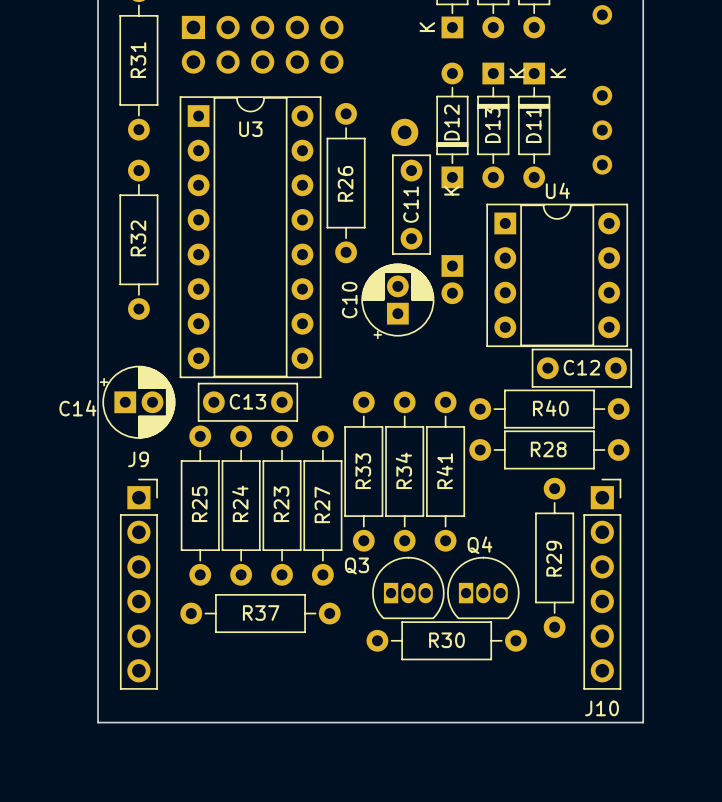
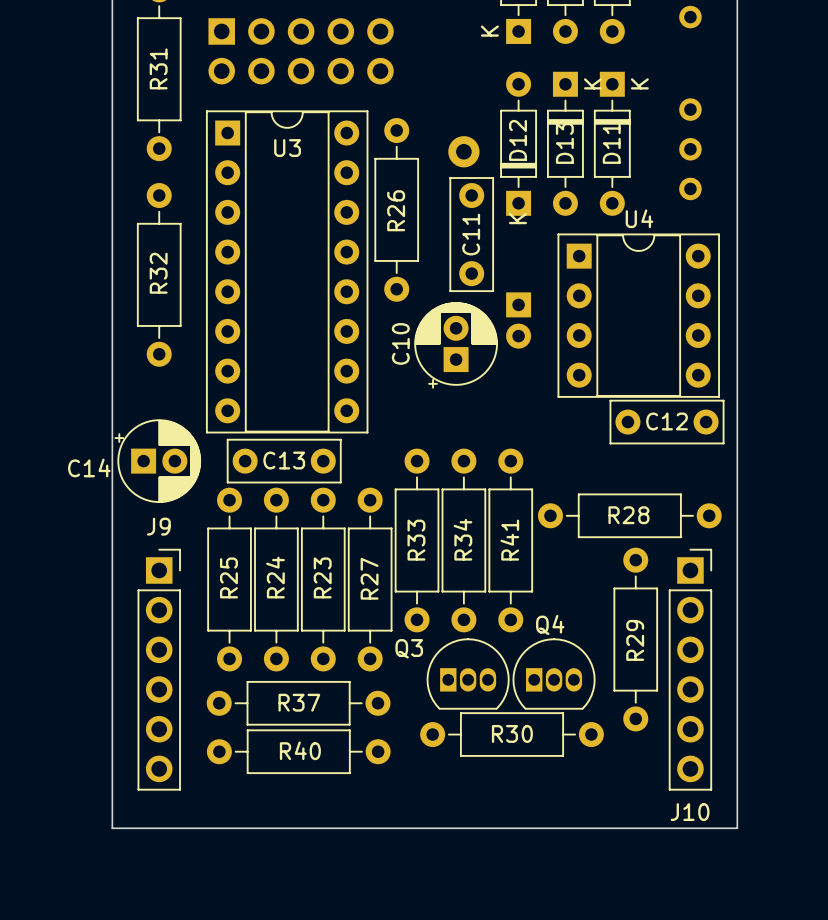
R40 position: (549, 409) -> (298, 751)

